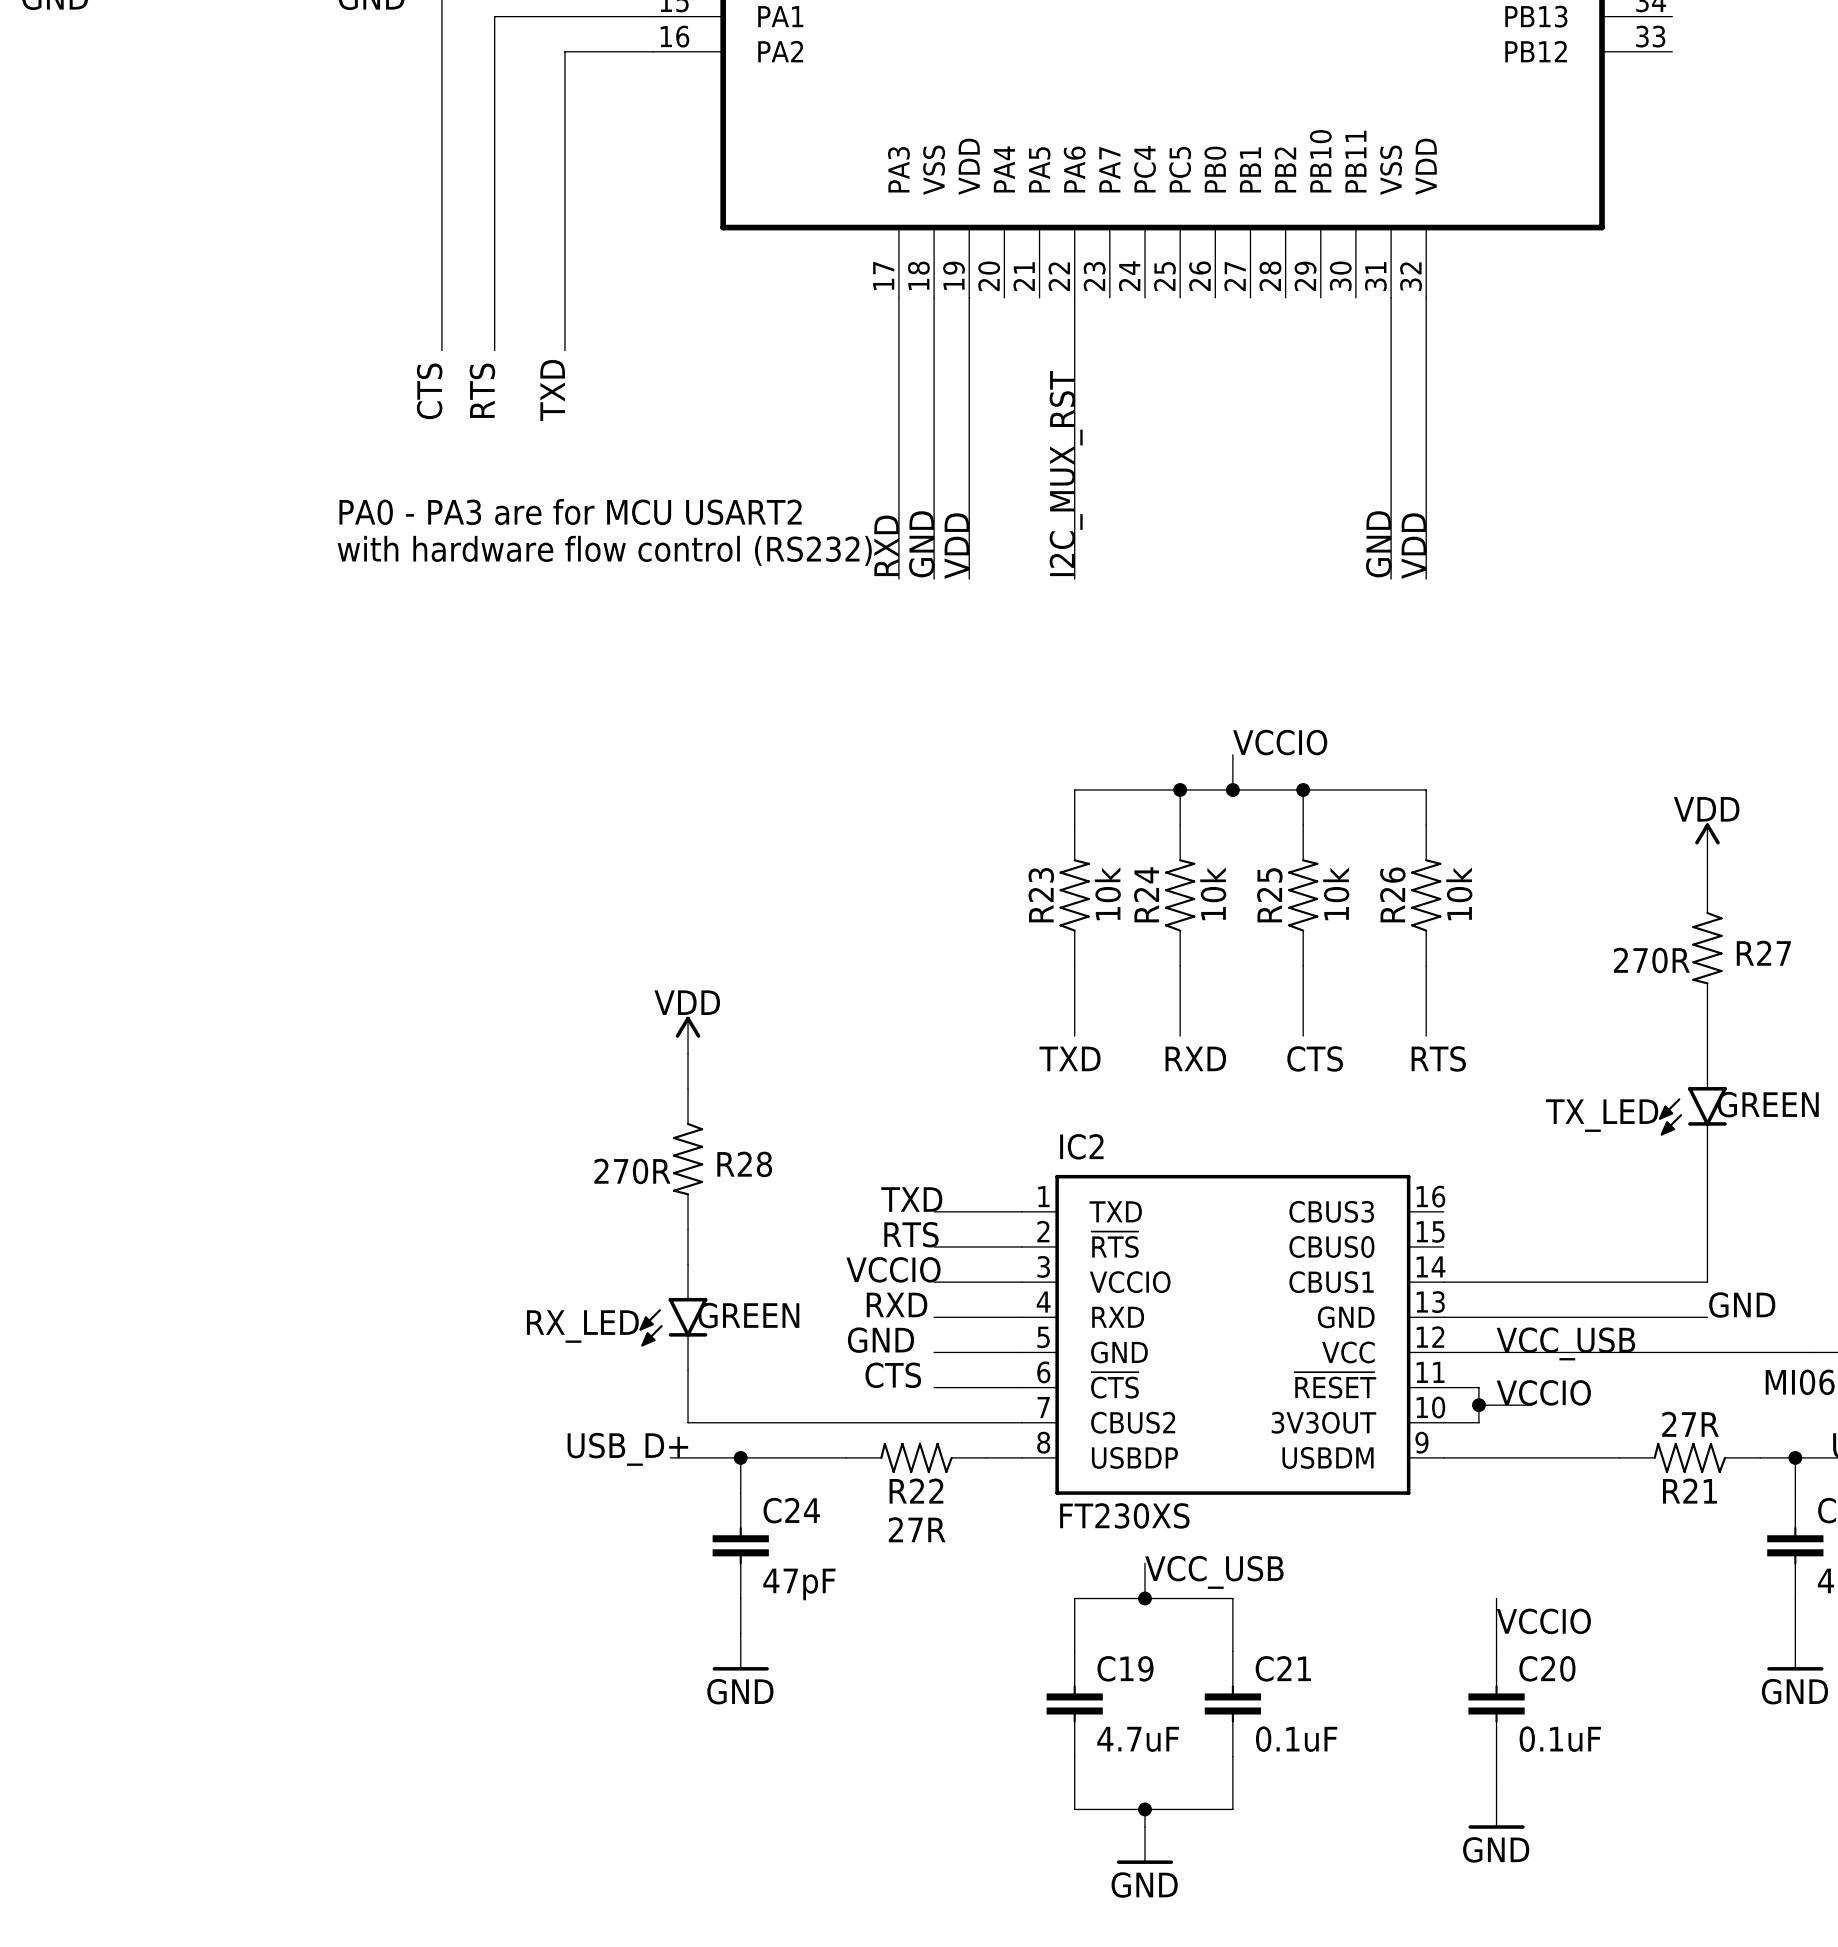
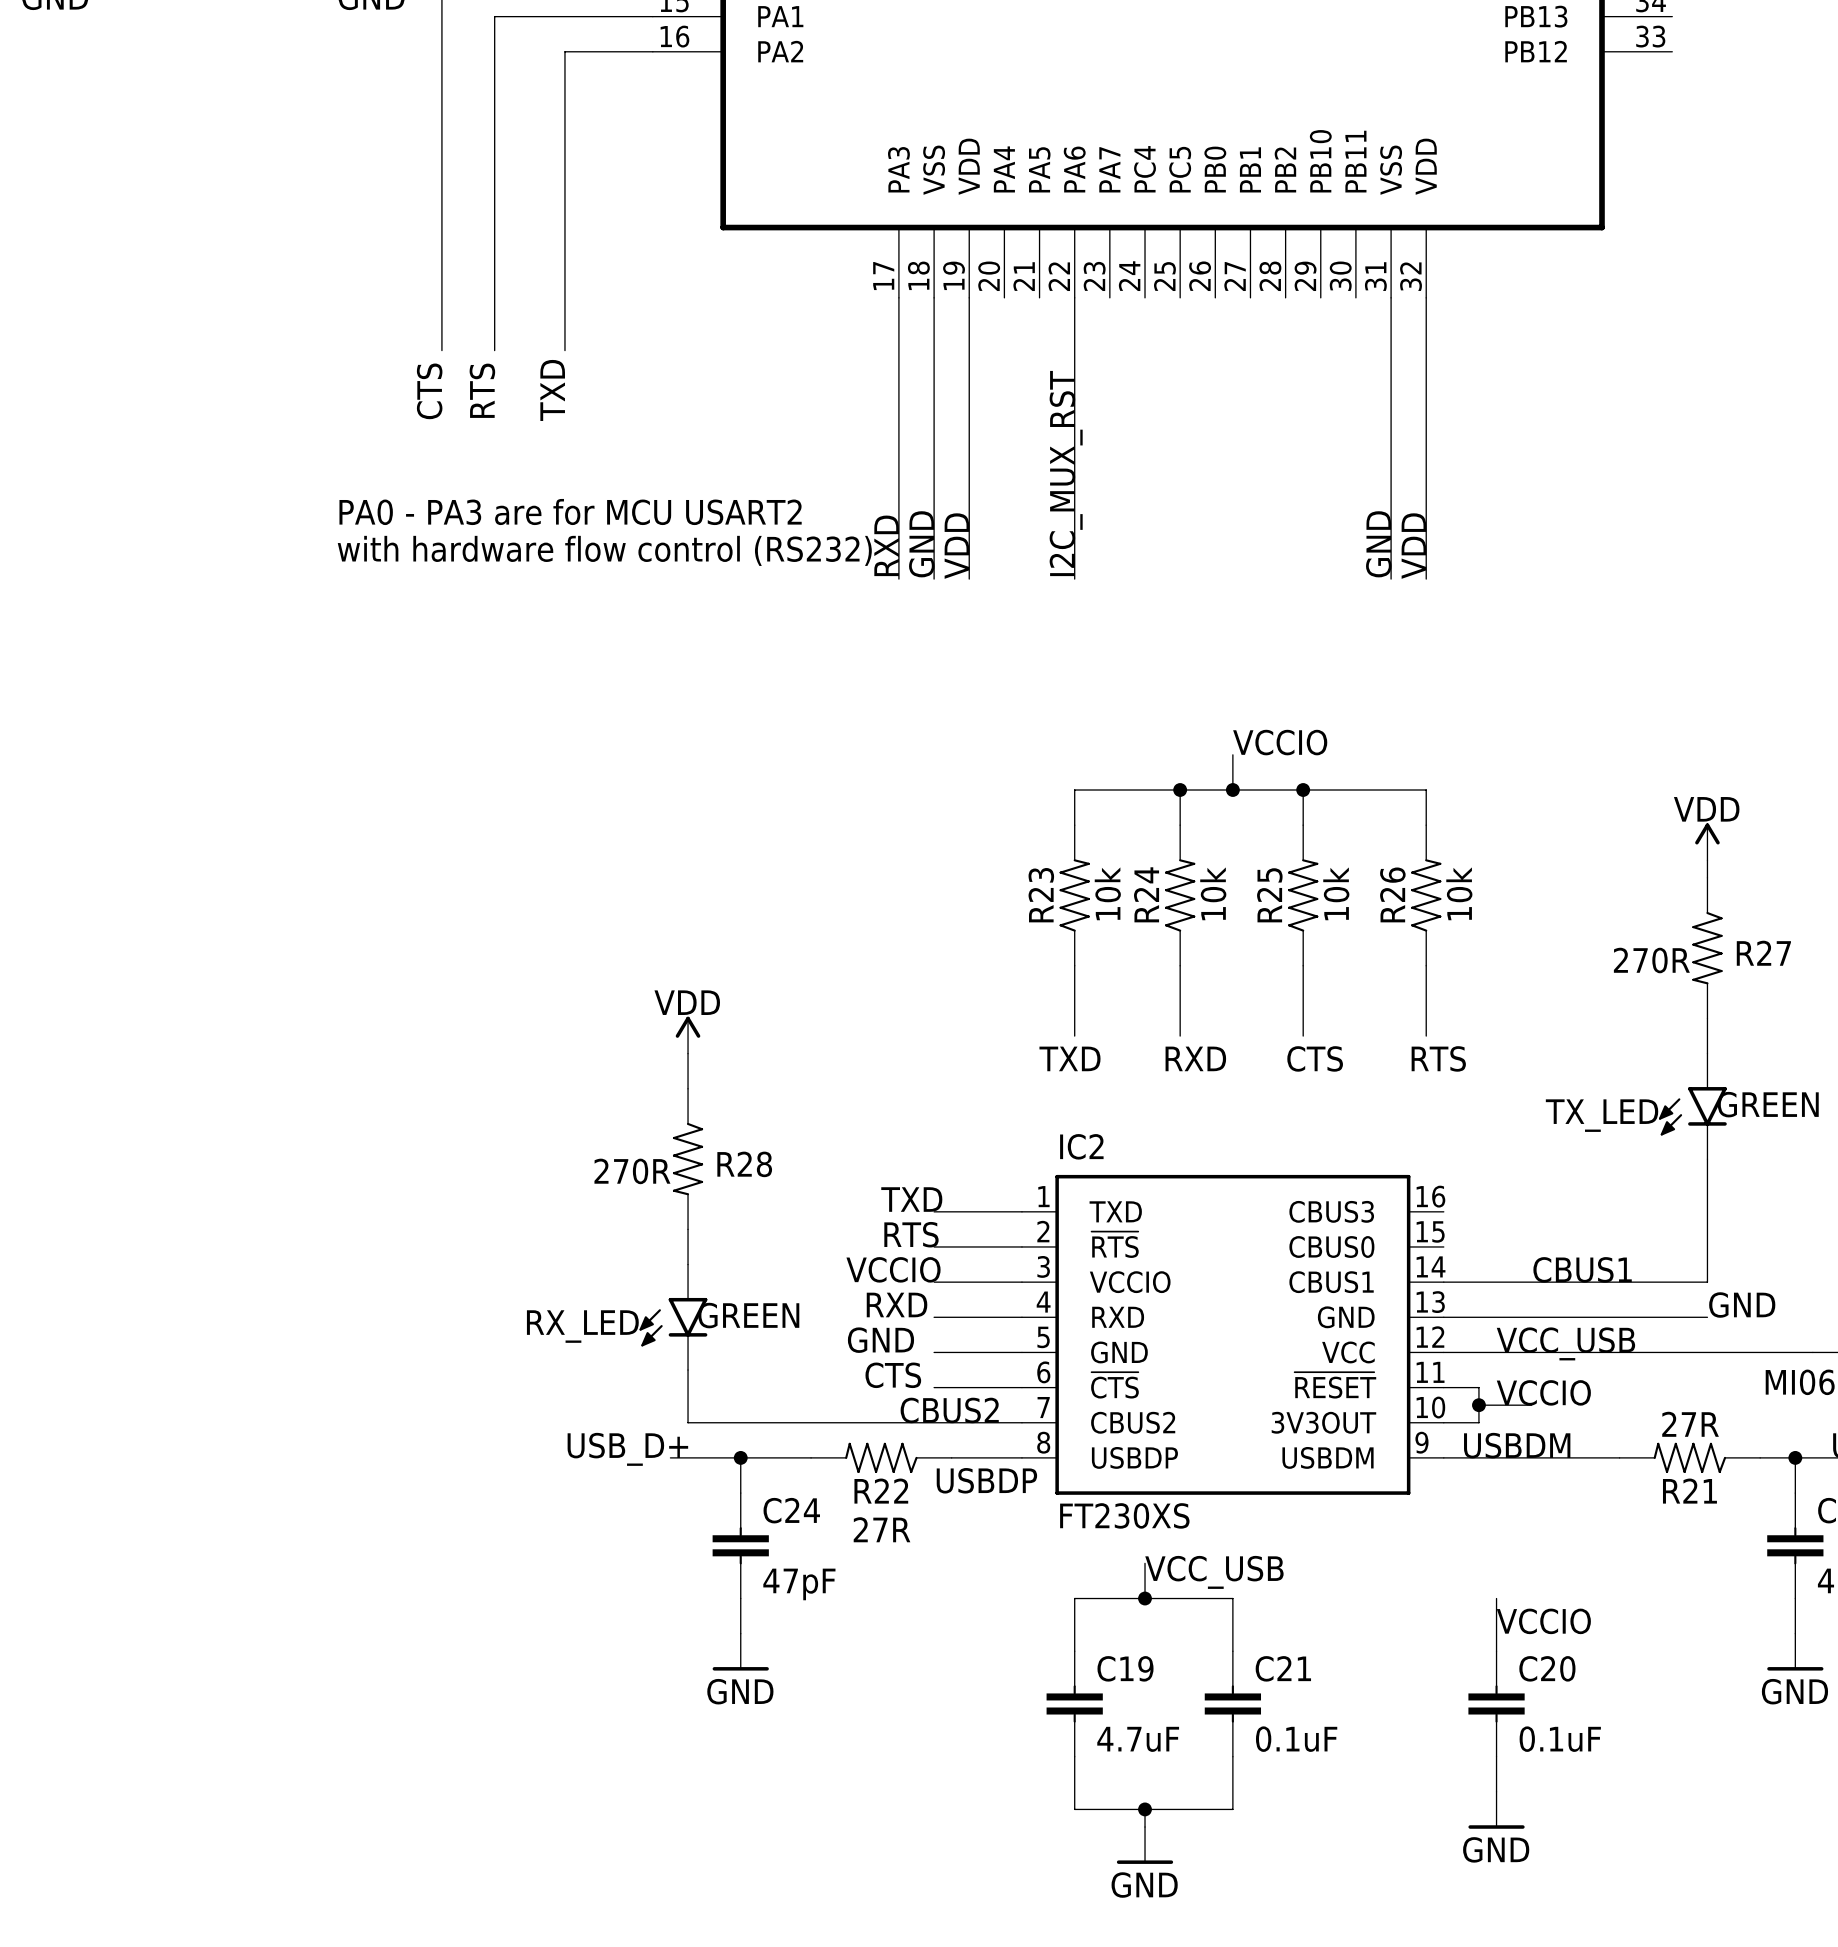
label: none -> CBUS1 (1582, 1269)
label: none -> CBUS2 (949, 1410)
label: none -> USBDM (1517, 1445)
R22 position: (916, 1457) -> (881, 1457)
label: none -> USBDP (986, 1480)

